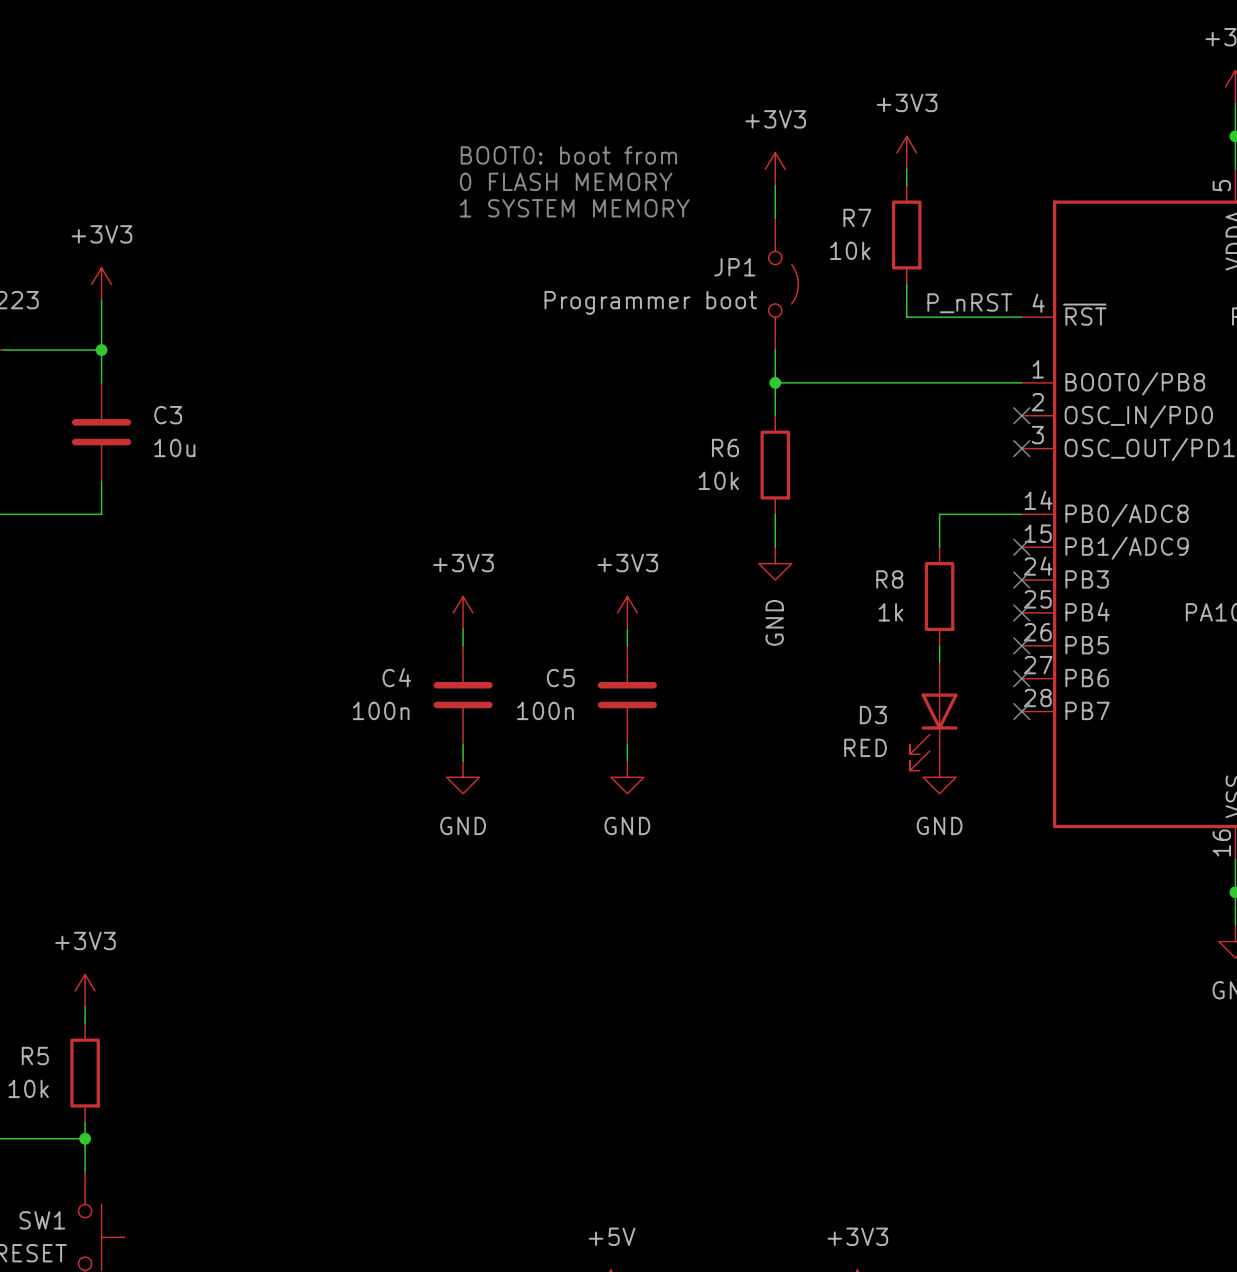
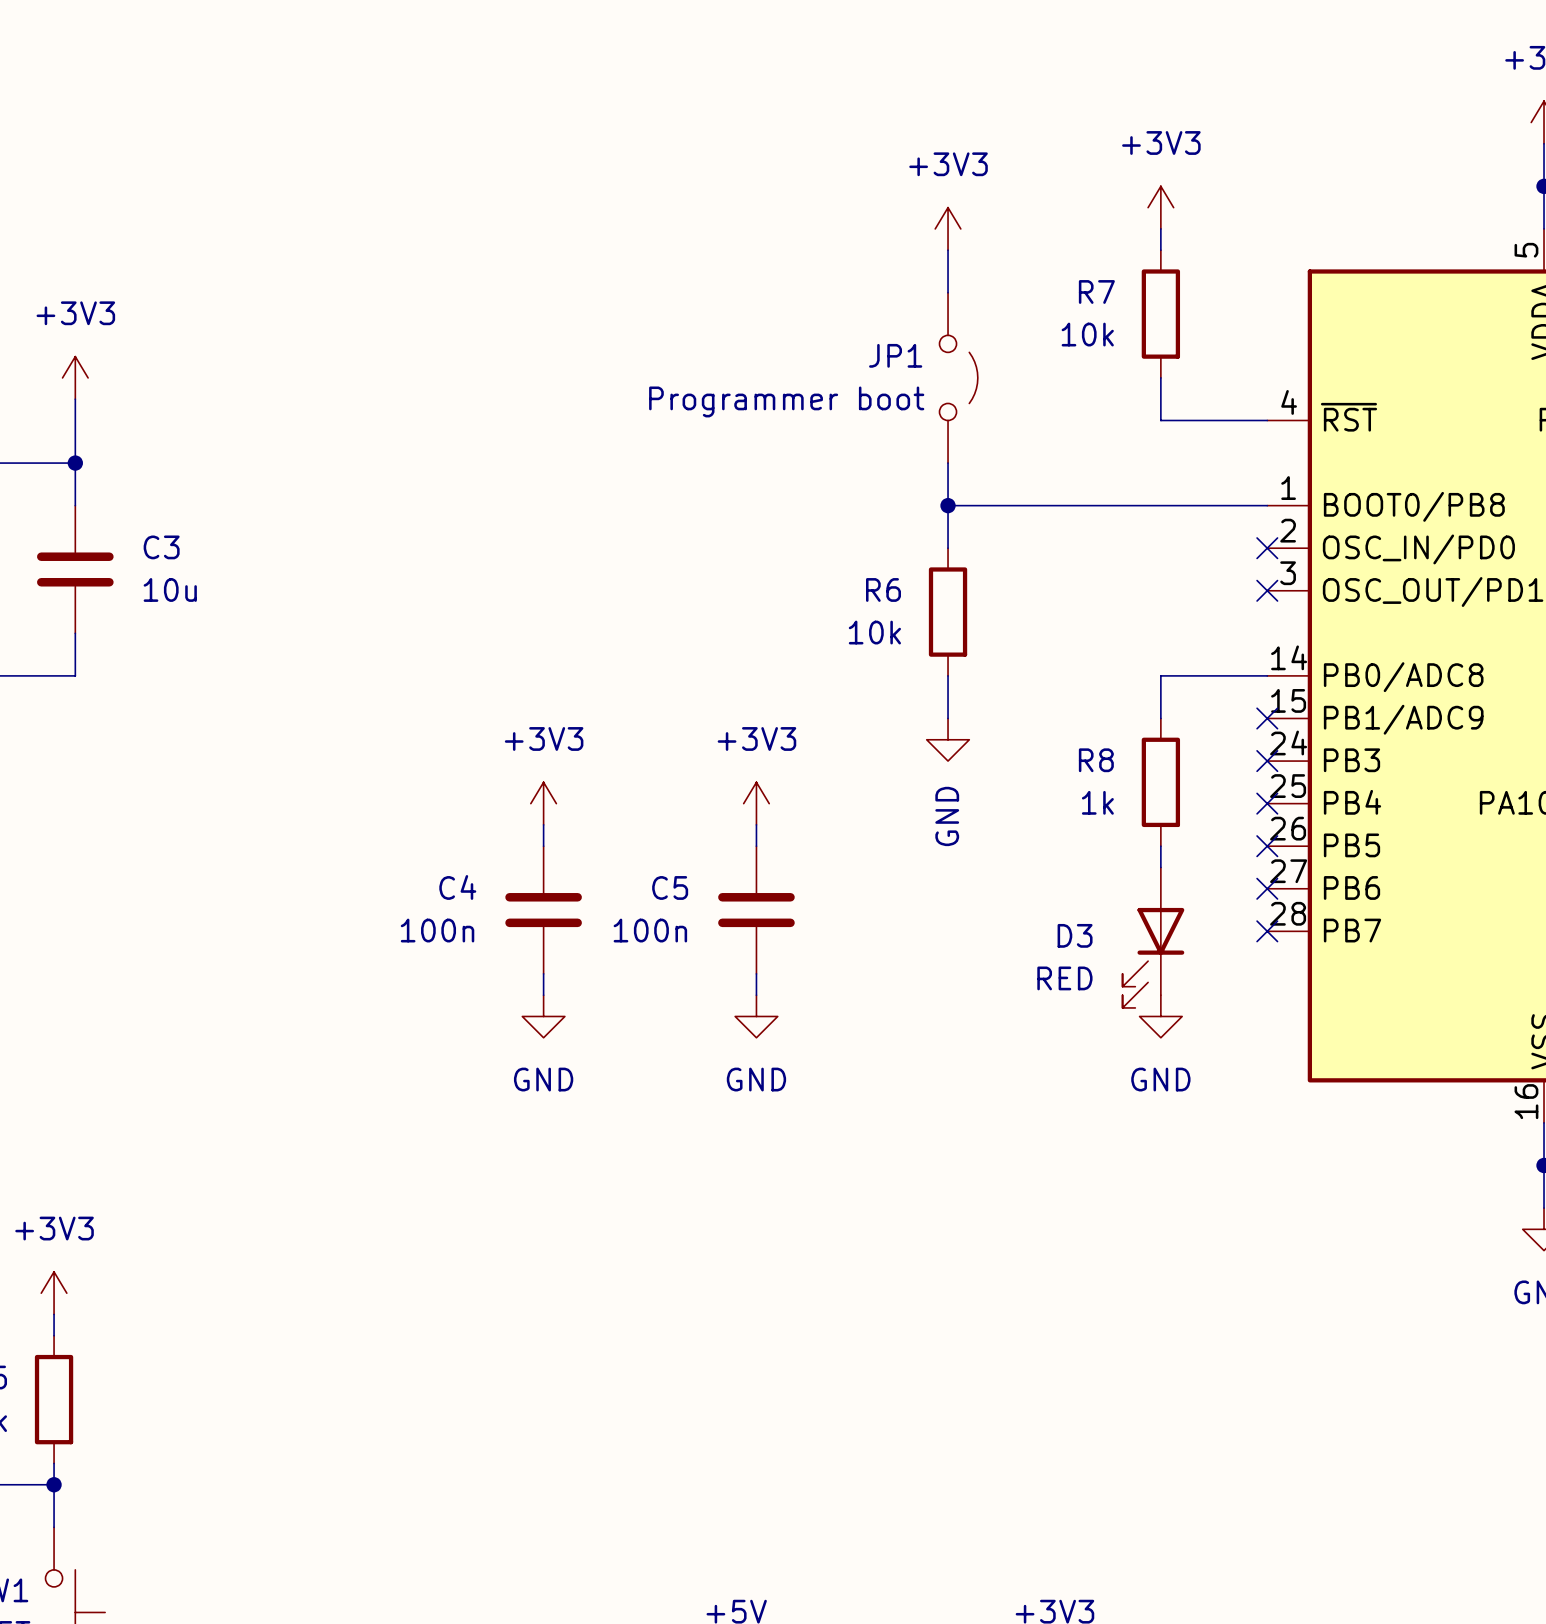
power symbol position: +3V3 (906, 152) -> +3V3 (1160, 207)
text: BOOT0: boot from (568, 155) -> none
wire: (906, 169) (906, 185) -> (1160, 228) (1160, 250)
text: 0 FLASH MEMORY (566, 181) -> none
text: 1 SYSTEM MEMORY (574, 208) -> none
R7 position: (906, 234) -> (1160, 314)
wire: (906, 284) (906, 317) (939, 317) -> (1160, 377) (1160, 420)
label: P_nRST (969, 303) -> none

